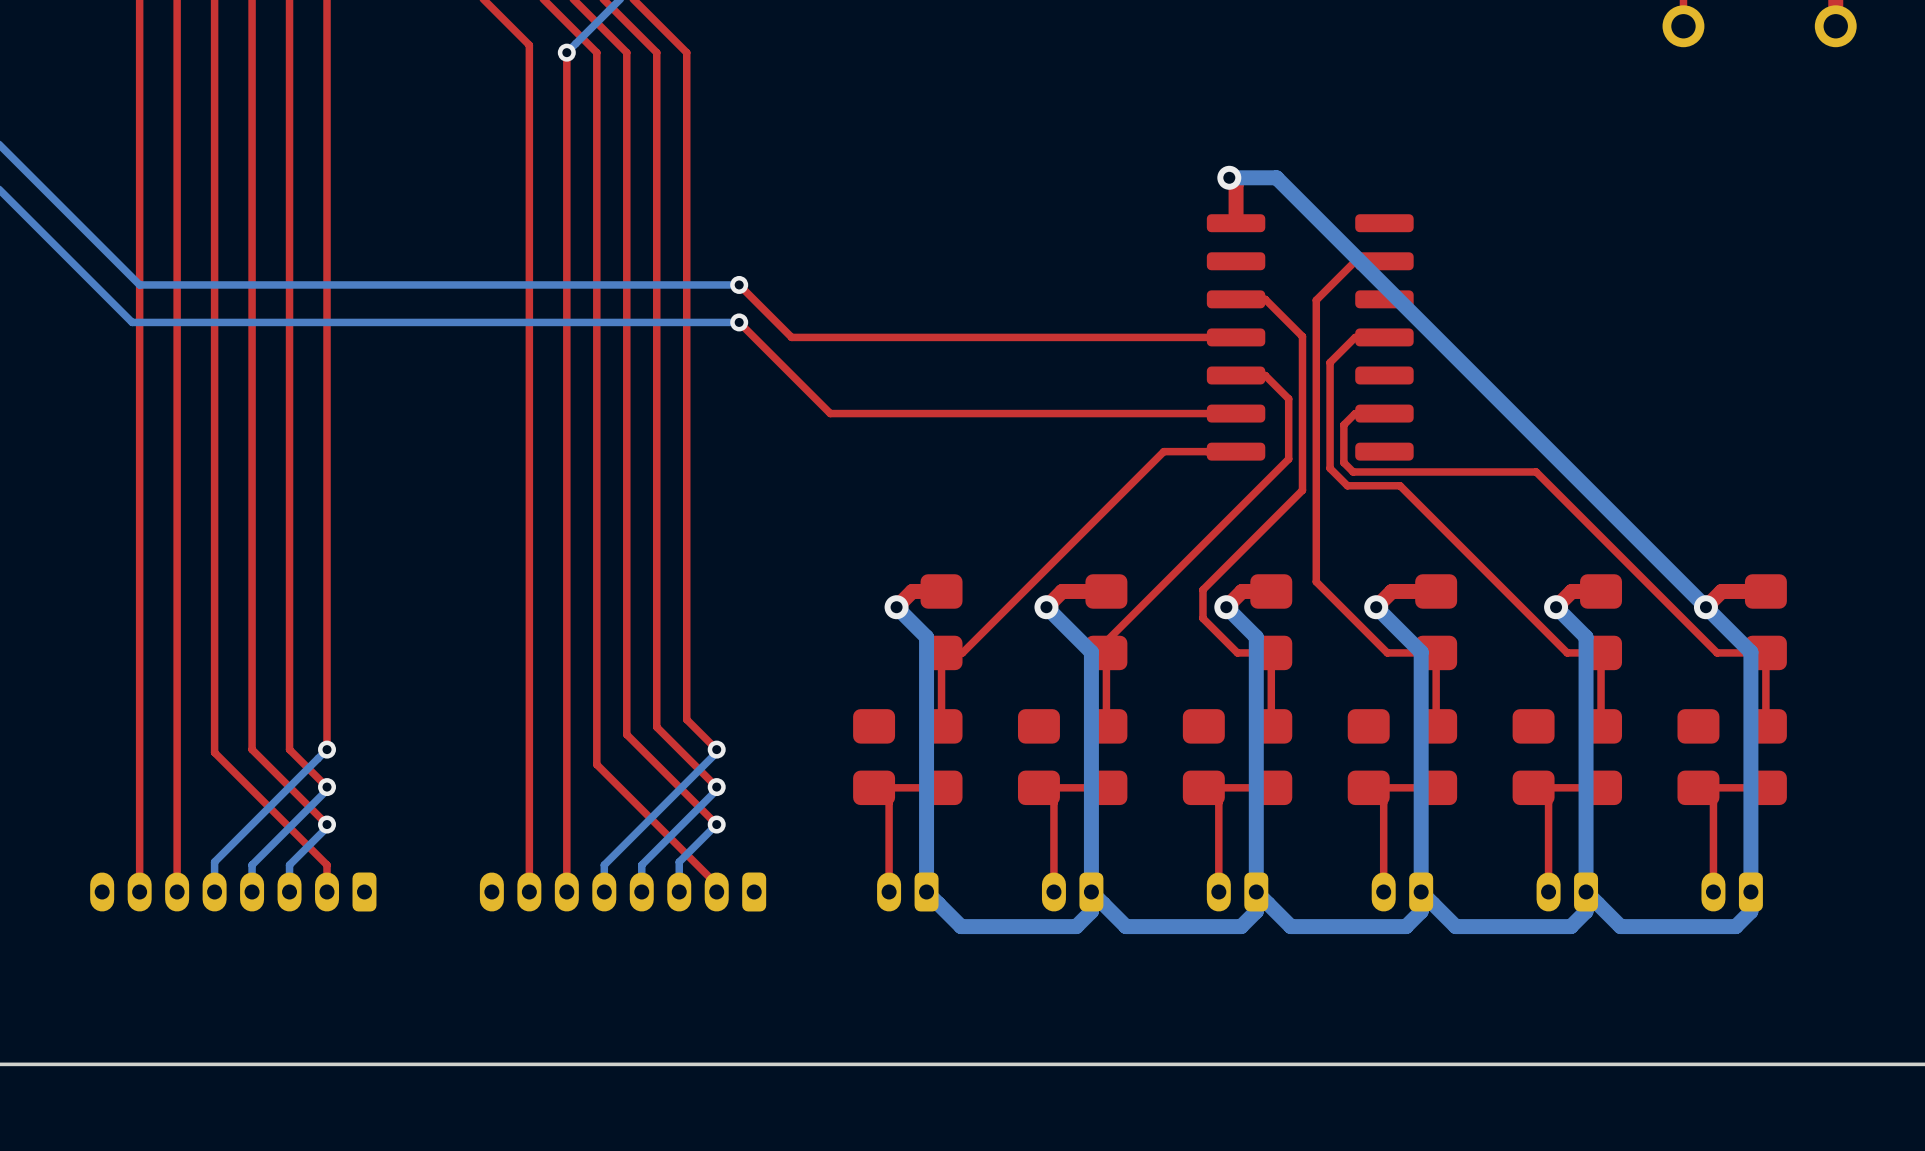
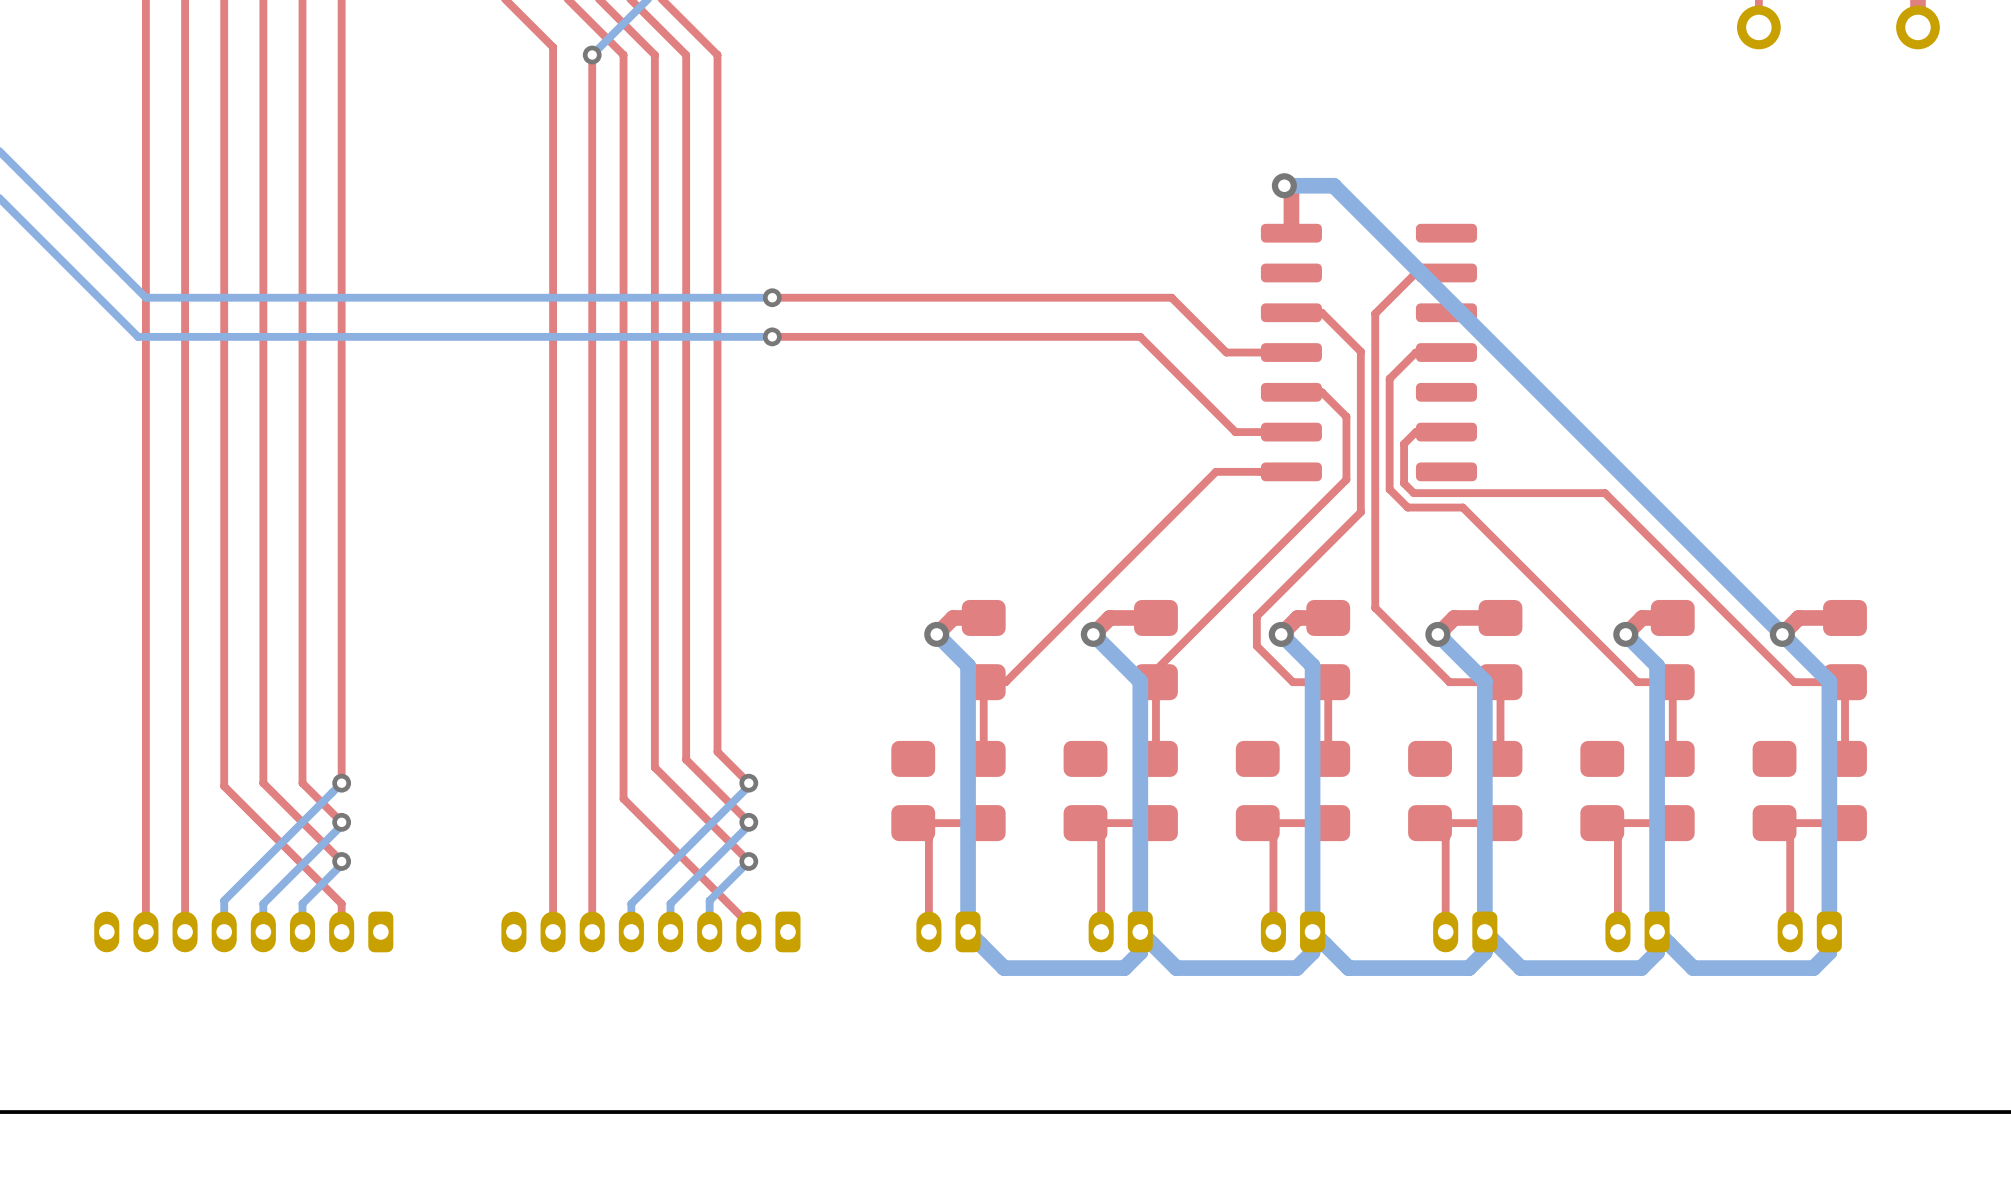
top track: (739, 284) (791, 337) (1173, 337) -> (772, 297) (1171, 297) (1226, 352)
top track: (739, 322) (830, 413) (1182, 413) -> (772, 336) (1140, 336) (1235, 432)

